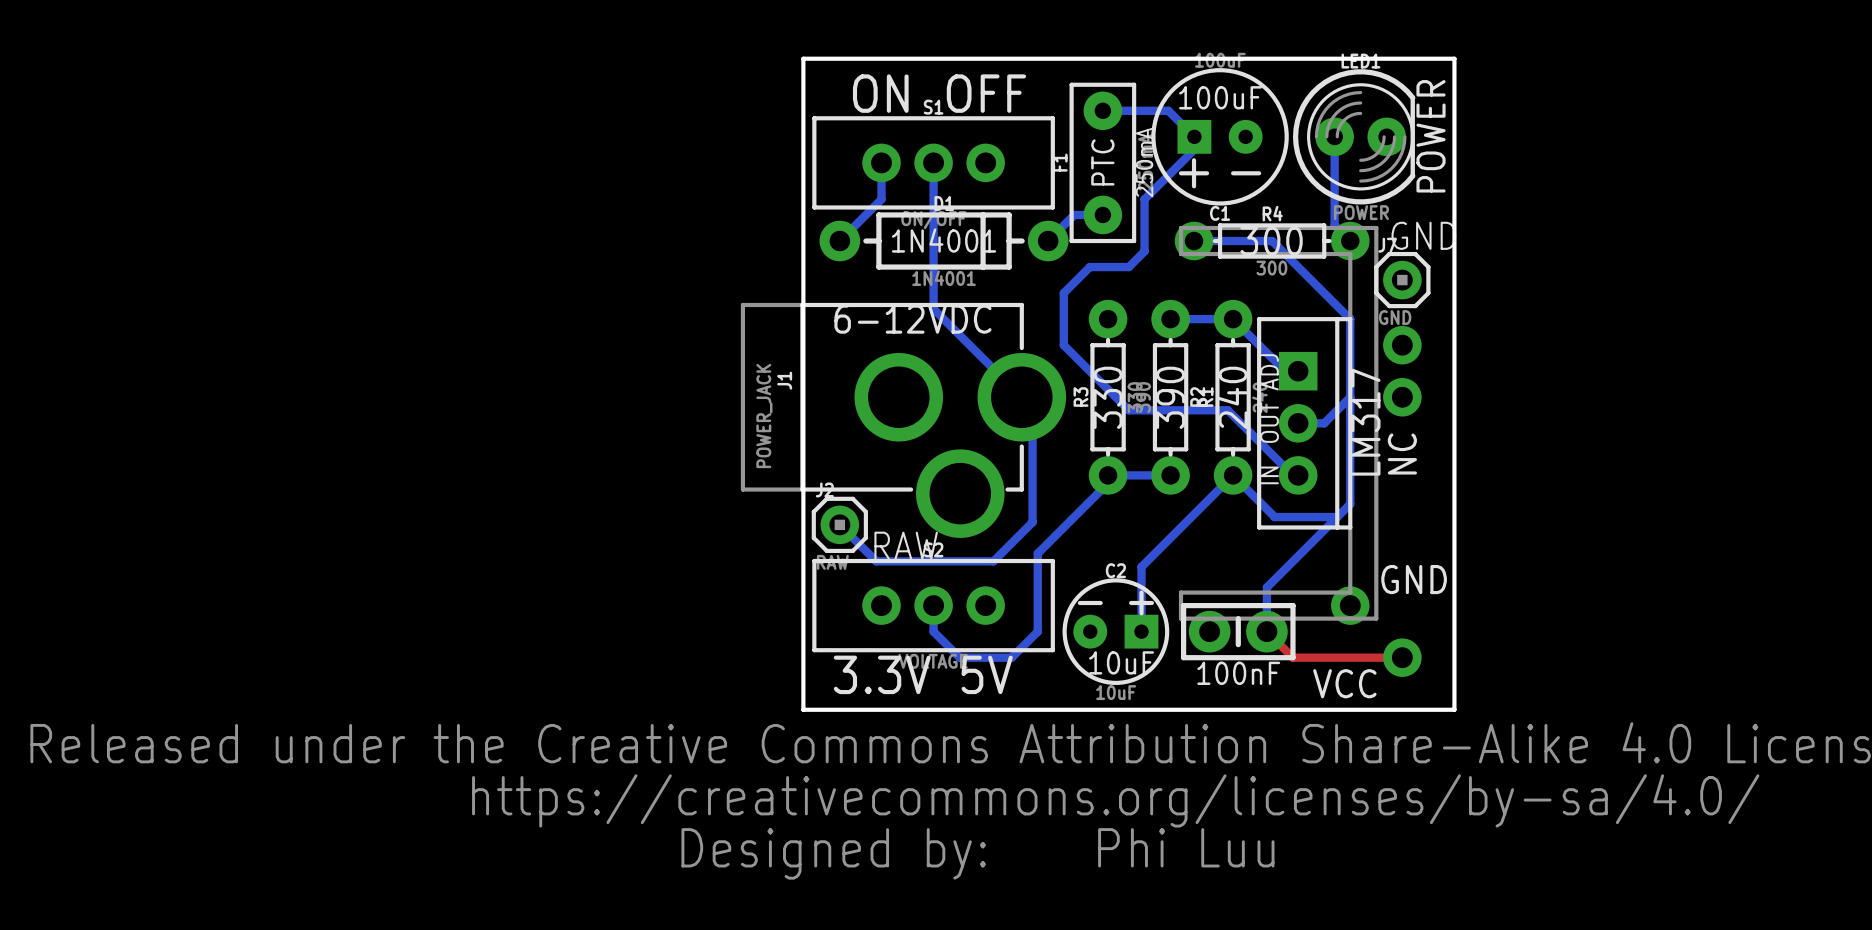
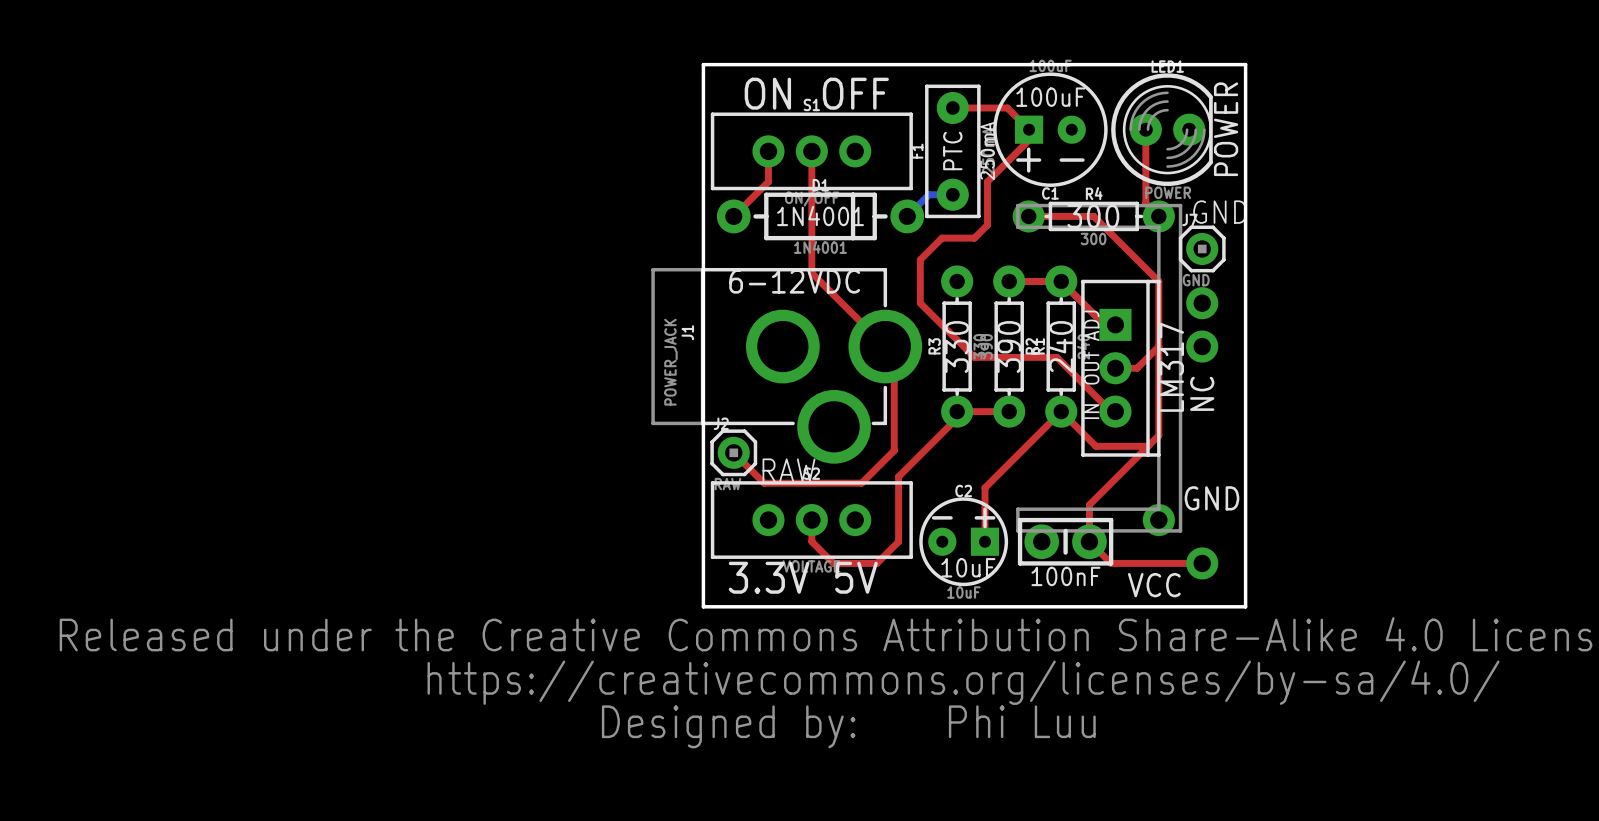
bottom track: (1102, 110) (1168, 110) (1194, 136) (1194, 149) (1144, 199) (1144, 251) (1128, 267) (1089, 267) (1063, 293) (1063, 345) (1128, 410) (1227, 410) (1292, 475) -> none
top track: none -> (952, 108) (1007, 108) (1029, 129) (1029, 140) (987, 181) (987, 225) (974, 238) (941, 238) (920, 259) (920, 303) (974, 357) (1056, 357) (1111, 411)
bottom track: (1334, 136) (1334, 225) (1350, 241) -> none
top track: none -> (1145, 129) (1145, 203) (1158, 216)
bottom track: (881, 162) (881, 199) (839, 241) -> none
top track: none -> (768, 151) (768, 181) (733, 216)
bottom track: (933, 162) (933, 309) (1035, 410) -> none
top track: none -> (811, 151) (811, 273) (896, 357)
bottom track: (1194, 241) (1272, 241) (1350, 319) (1350, 504) (1266, 587) (1266, 631) -> none
top track: none -> (1028, 216) (1093, 216) (1158, 281) (1158, 435) (1089, 504) (1089, 541)
top track: none -> (1009, 281) (1061, 281) (1104, 324) (1115, 324)
bottom track: (1350, 397) (1324, 423) (1285, 423) -> none
top track: none -> (1158, 346) (1137, 368) (1104, 368)
bottom track: (1032, 408) (1032, 522) (993, 561) (876, 561) (839, 524) -> none
top track: none -> (894, 355) (894, 450) (861, 483) (764, 483) (733, 452)
bottom track: (1170, 475) (1108, 475) (1108, 483) (1037, 553) (1037, 631) (1011, 657) (959, 657) (933, 631) (933, 605) -> none
top track: none -> (1009, 411) (957, 411) (957, 418) (898, 476) (898, 541) (876, 563) (833, 563) (811, 541) (811, 520)
bottom track: (1337, 517) (1274, 517) (1233, 475) (1141, 566) (1141, 631) -> none
top track: none -> (1148, 446) (1095, 446) (1061, 411) (985, 487) (985, 541)

